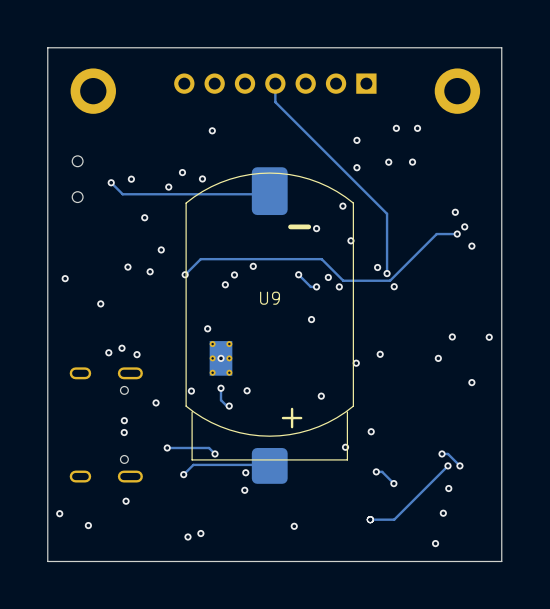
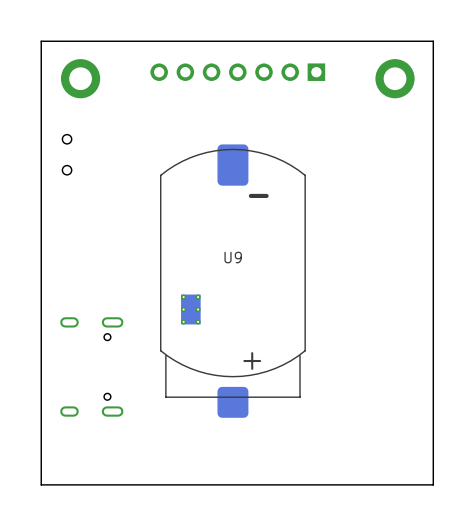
track: (275, 83) (275, 102) (387, 213) (387, 273) -> none
via: (396, 128) -> none
via: (417, 128) -> none
via: (212, 130) -> none
via: (356, 140) -> none
via: (388, 162) -> none
via: (412, 162) -> none
via: (356, 167) -> none
via: (182, 172) -> none
via: (202, 178) -> none
via: (131, 179) -> none
track: (111, 182) (122, 194) (266, 194) (269, 191) -> none
via: (111, 182) -> none
via: (168, 187) -> none
via: (342, 206) -> none
via: (455, 212) -> none
via: (144, 217) -> none
via: (464, 226) -> none
via: (316, 228) -> none
track: (457, 234) (436, 234) (390, 280) (343, 280) (321, 259) (200, 259) (185, 274) -> none
via: (457, 234) -> none
via: (350, 240) -> none
via: (471, 246) -> none
via: (161, 249) -> none
via: (253, 266) -> none
via: (127, 267) -> none
via: (377, 267) -> none
via: (150, 271) -> none
via: (387, 273) -> none
via: (185, 274) -> none
via: (234, 274) -> none
track: (298, 274) (310, 286) (316, 286) -> none
via: (298, 274) -> none
via: (328, 277) -> none
via: (65, 278) -> none
via: (225, 284) -> none
via: (316, 286) -> none
via: (339, 286) -> none
via: (394, 286) -> none
via: (100, 303) -> none
via: (311, 319) -> none
via: (207, 328) -> none
via: (452, 336) -> none
via: (489, 337) -> none
via: (121, 348) -> none
via: (108, 352) -> none
via: (137, 354) -> none
via: (380, 354) -> none
via: (221, 358) -> none
via: (438, 358) -> none
via: (356, 363) -> none
via: (471, 382) -> none
track: (221, 388) (221, 400) (226, 406) -> none
via: (221, 388) -> none
via: (247, 390) -> none
via: (191, 391) -> none
via: (321, 396) -> none
via: (156, 402) -> none
via: (229, 406) -> none
via: (124, 420) -> none
via: (371, 431) -> none
via: (124, 432) -> none
track: (167, 447) (209, 447) (215, 453) -> none
via: (167, 447) -> none
via: (345, 447) -> none
via: (215, 453) -> none
track: (442, 453) (447, 453) (459, 465) -> none
via: (442, 453) -> none
track: (269, 465) (193, 464) (183, 474) -> none
track: (447, 465) (394, 519) (370, 519) -> none
via: (447, 465) -> none
via: (459, 465) -> none
track: (376, 471) (382, 471) (393, 483) -> none
via: (376, 471) -> none
via: (245, 472) -> none
via: (183, 474) -> none
via: (393, 483) -> none
via: (448, 488) -> none
via: (244, 490) -> none
via: (126, 501) -> none
via: (59, 513) -> none
via: (443, 513) -> none
via: (370, 519) -> none
via: (88, 525) -> none
via: (294, 526) -> none
via: (200, 533) -> none
via: (187, 536) -> none
via: (435, 543) -> none

